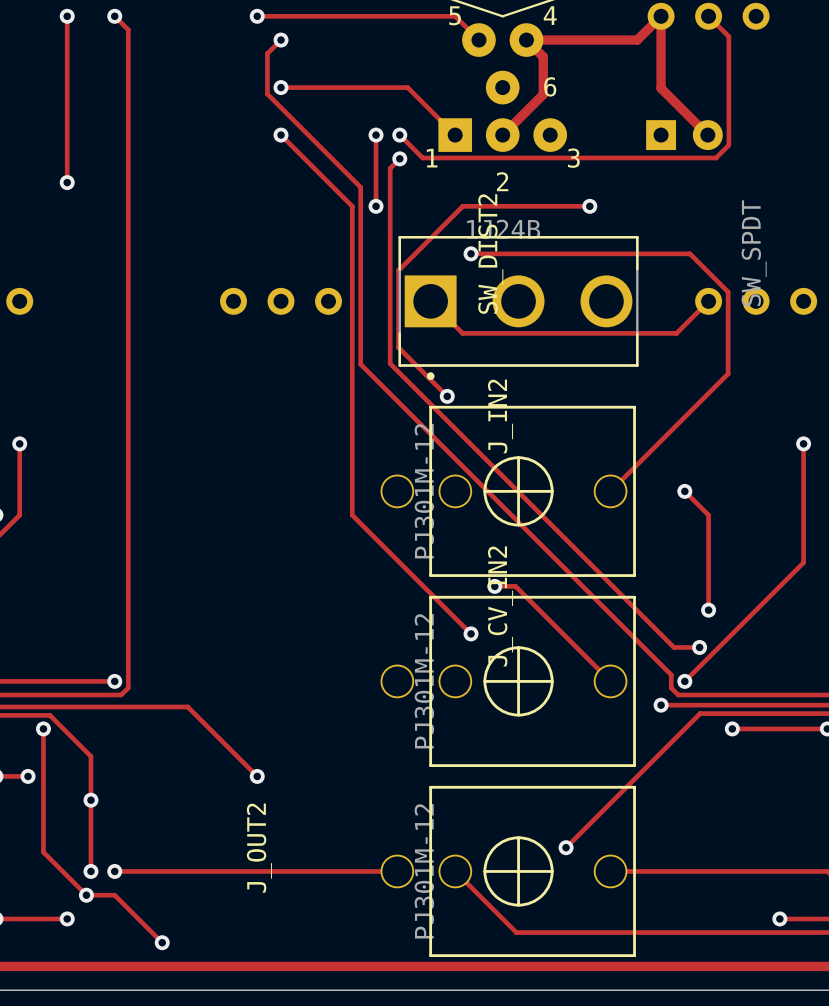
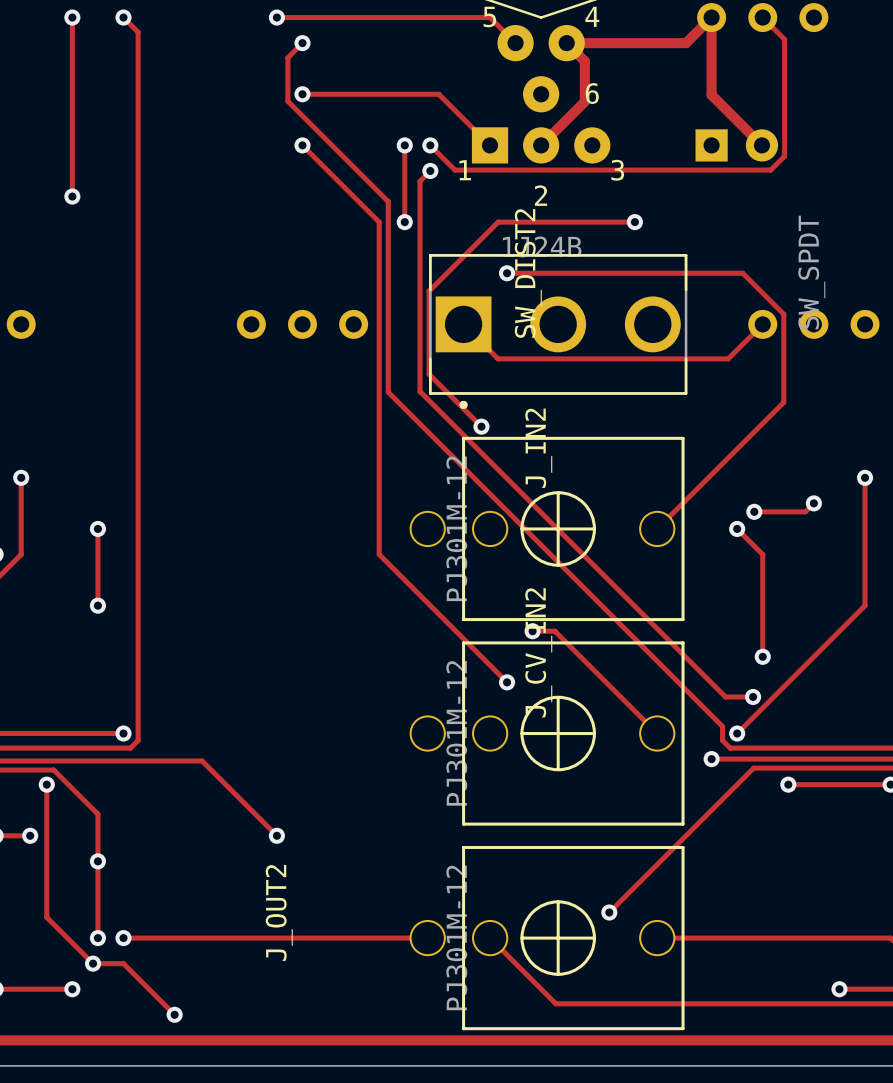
track: none -> (813, 503) (805, 511) (754, 511)
via: none -> (813, 503)
via: none -> (754, 511)
track: none -> (97, 528) (97, 605)
via: none -> (97, 528)
via: none -> (97, 605)

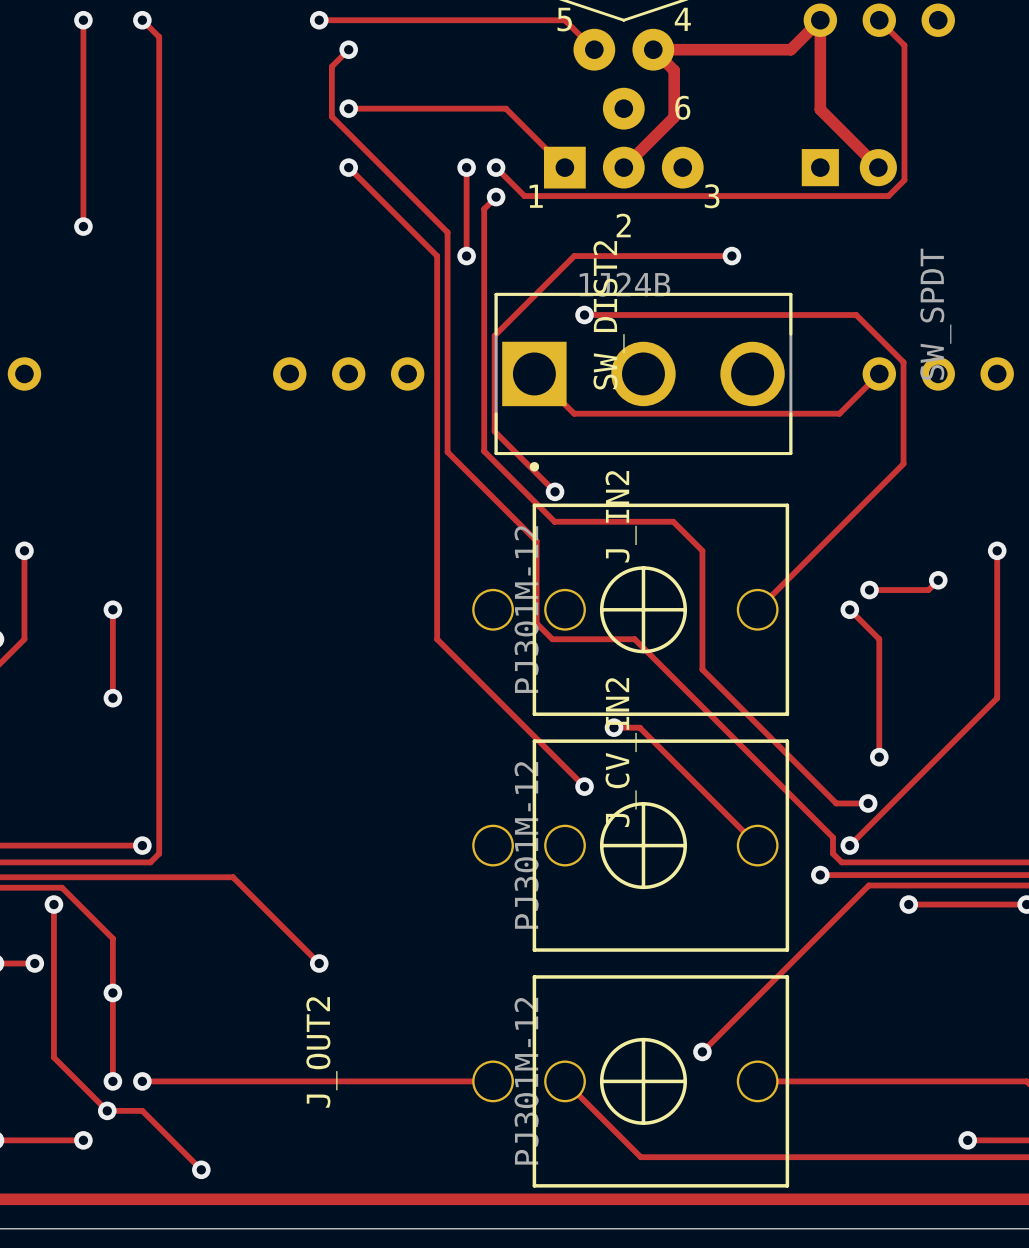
track: (481, 452) (609, 580) -> (554, 521) (673, 521) (702, 550) (702, 669)
track: (465, 469) (550, 554) -> (536, 541) (536, 623) (552, 639) (634, 639)

